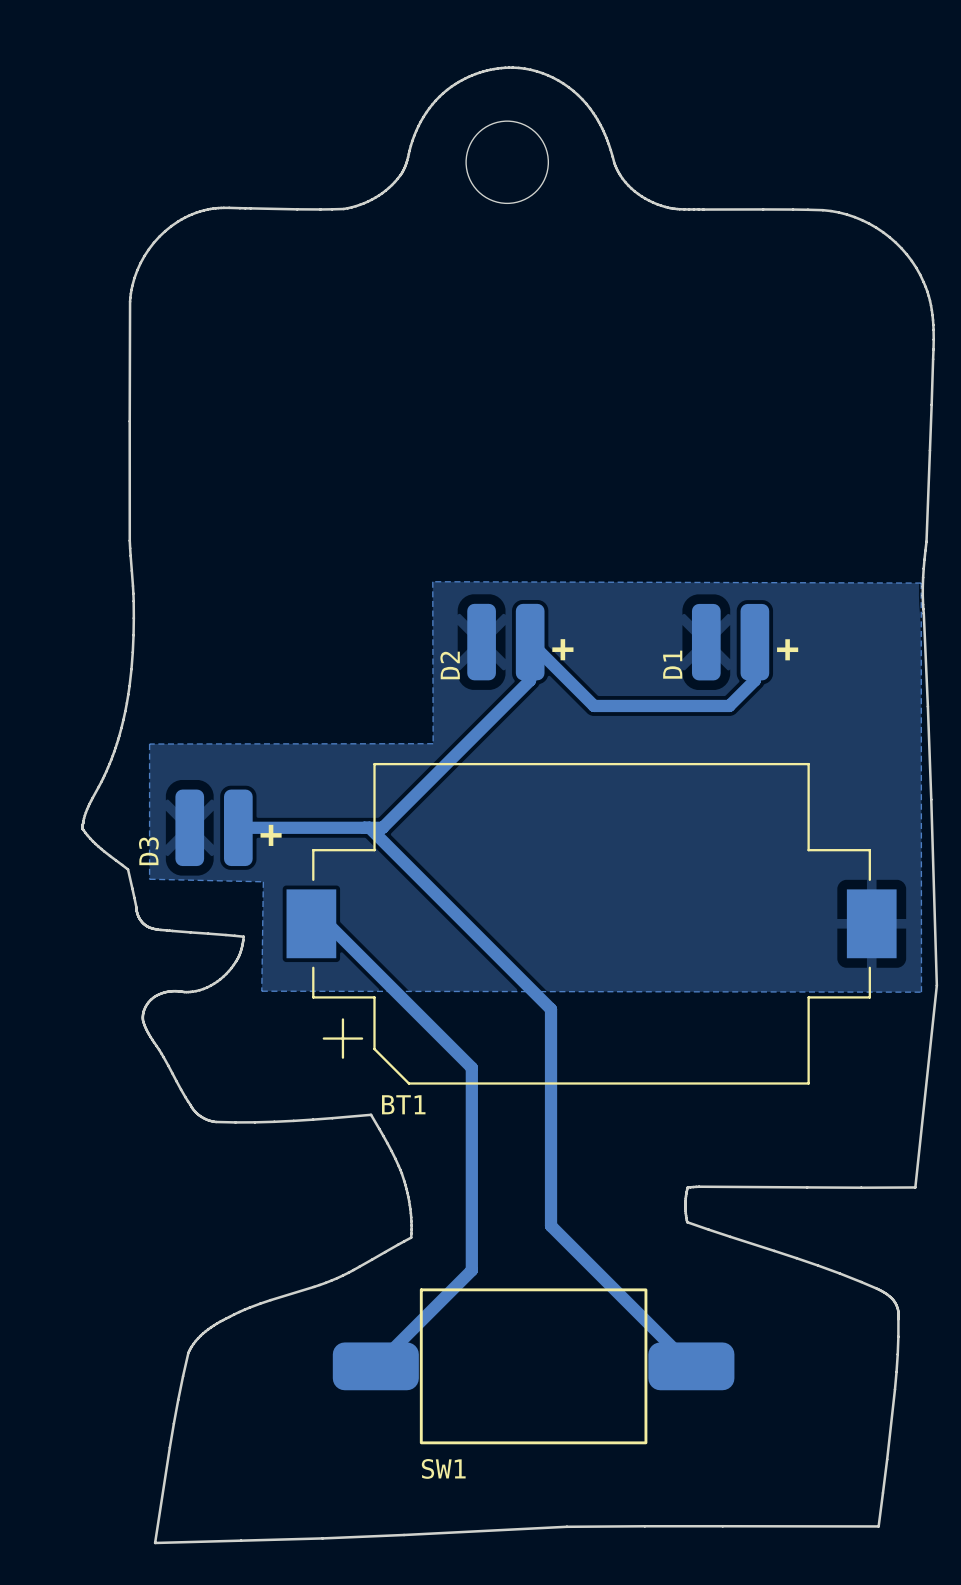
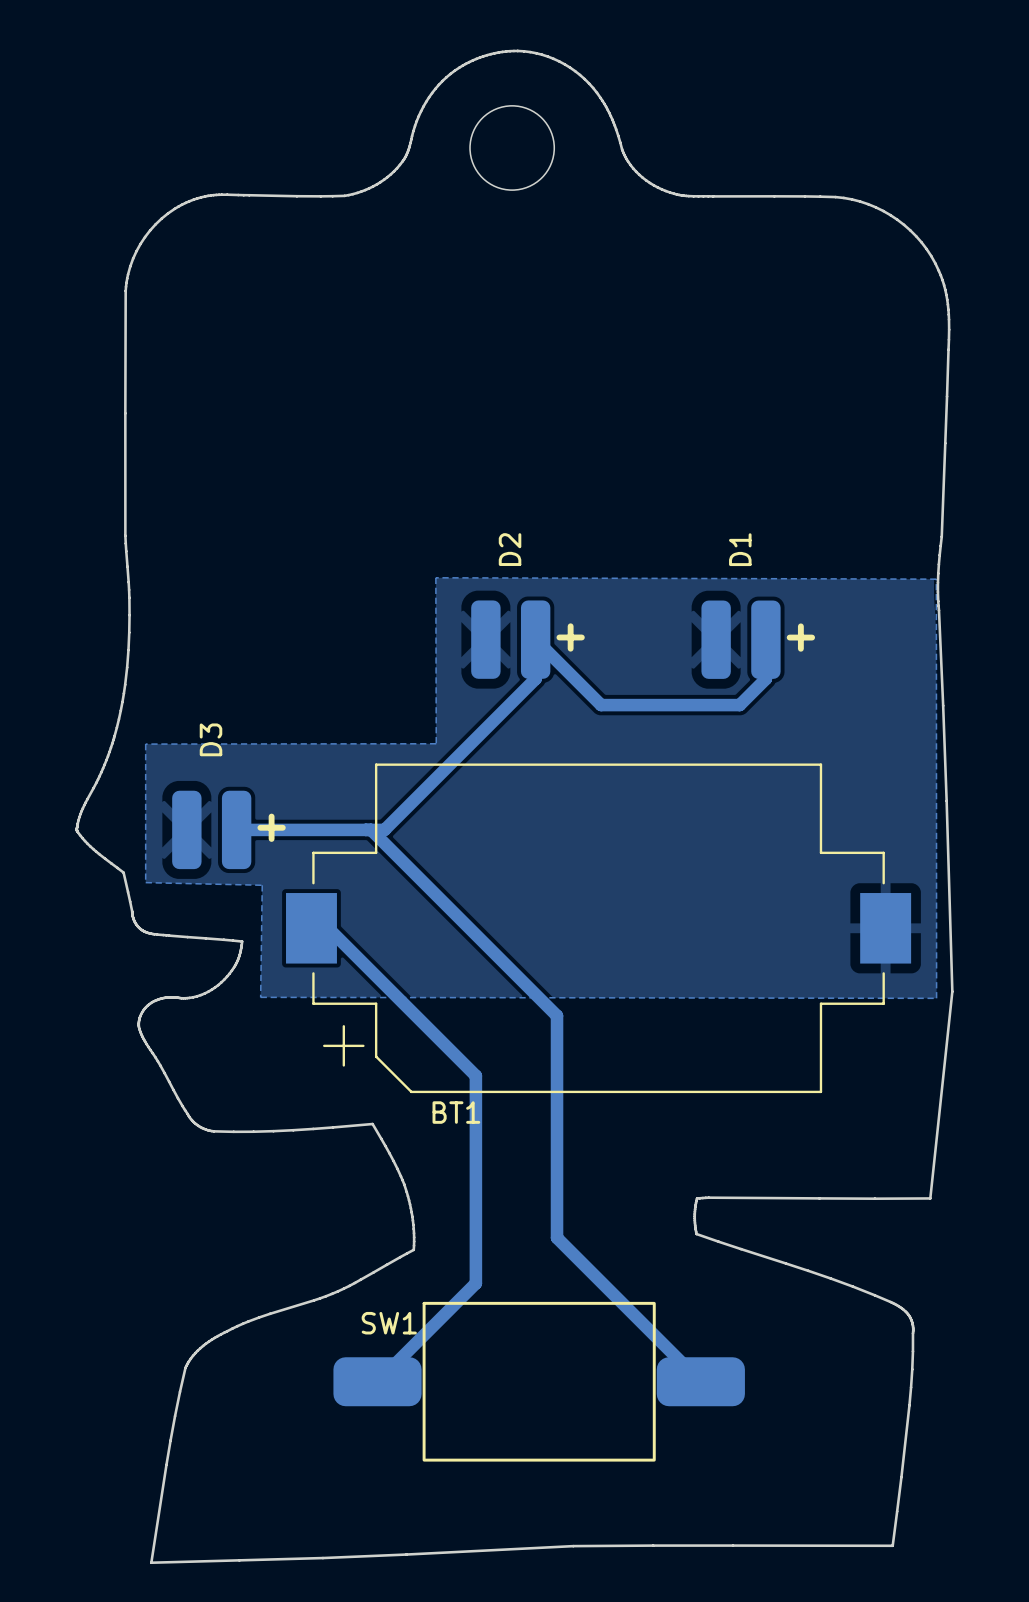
D1 name position: D1 (672, 664) -> D1 (740, 549)
D2 name position: D2 (450, 665) -> D2 (510, 549)
D3 name position: D3 (148, 851) -> D3 (211, 739)
BT1 name position: BT1 (403, 1104) -> BT1 (456, 1112)
SW1 name position: SW1 (443, 1468) -> SW1 (389, 1323)

